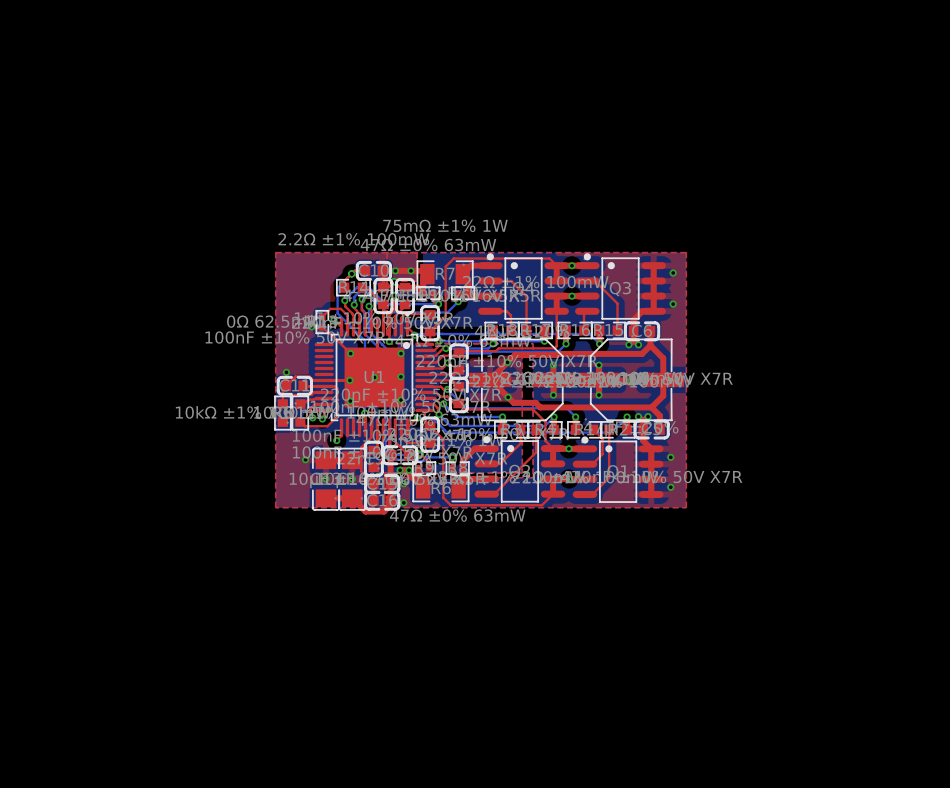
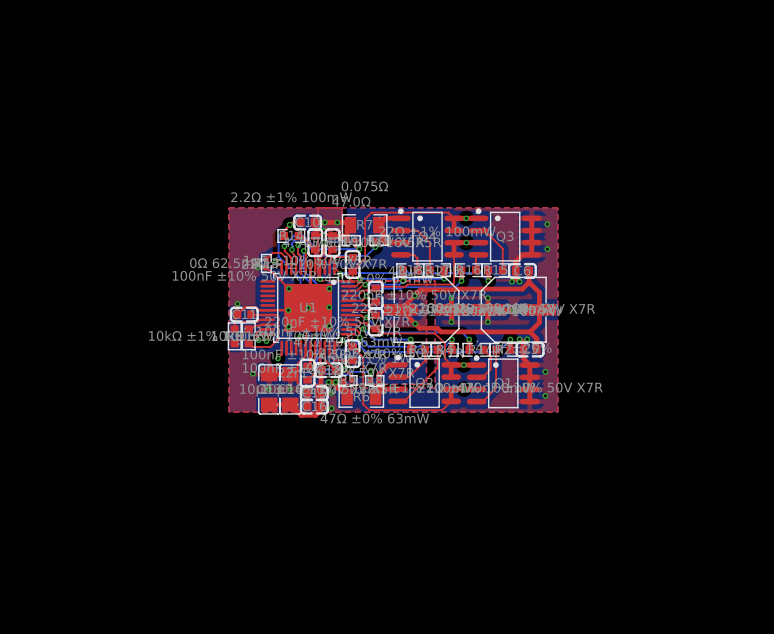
R7 value: 75mΩ ±1% 1W (445, 225) -> 0.075Ω (364, 186)
part value: 47Ω ±0% 63mW (428, 244) -> 47.0Ω (351, 201)

